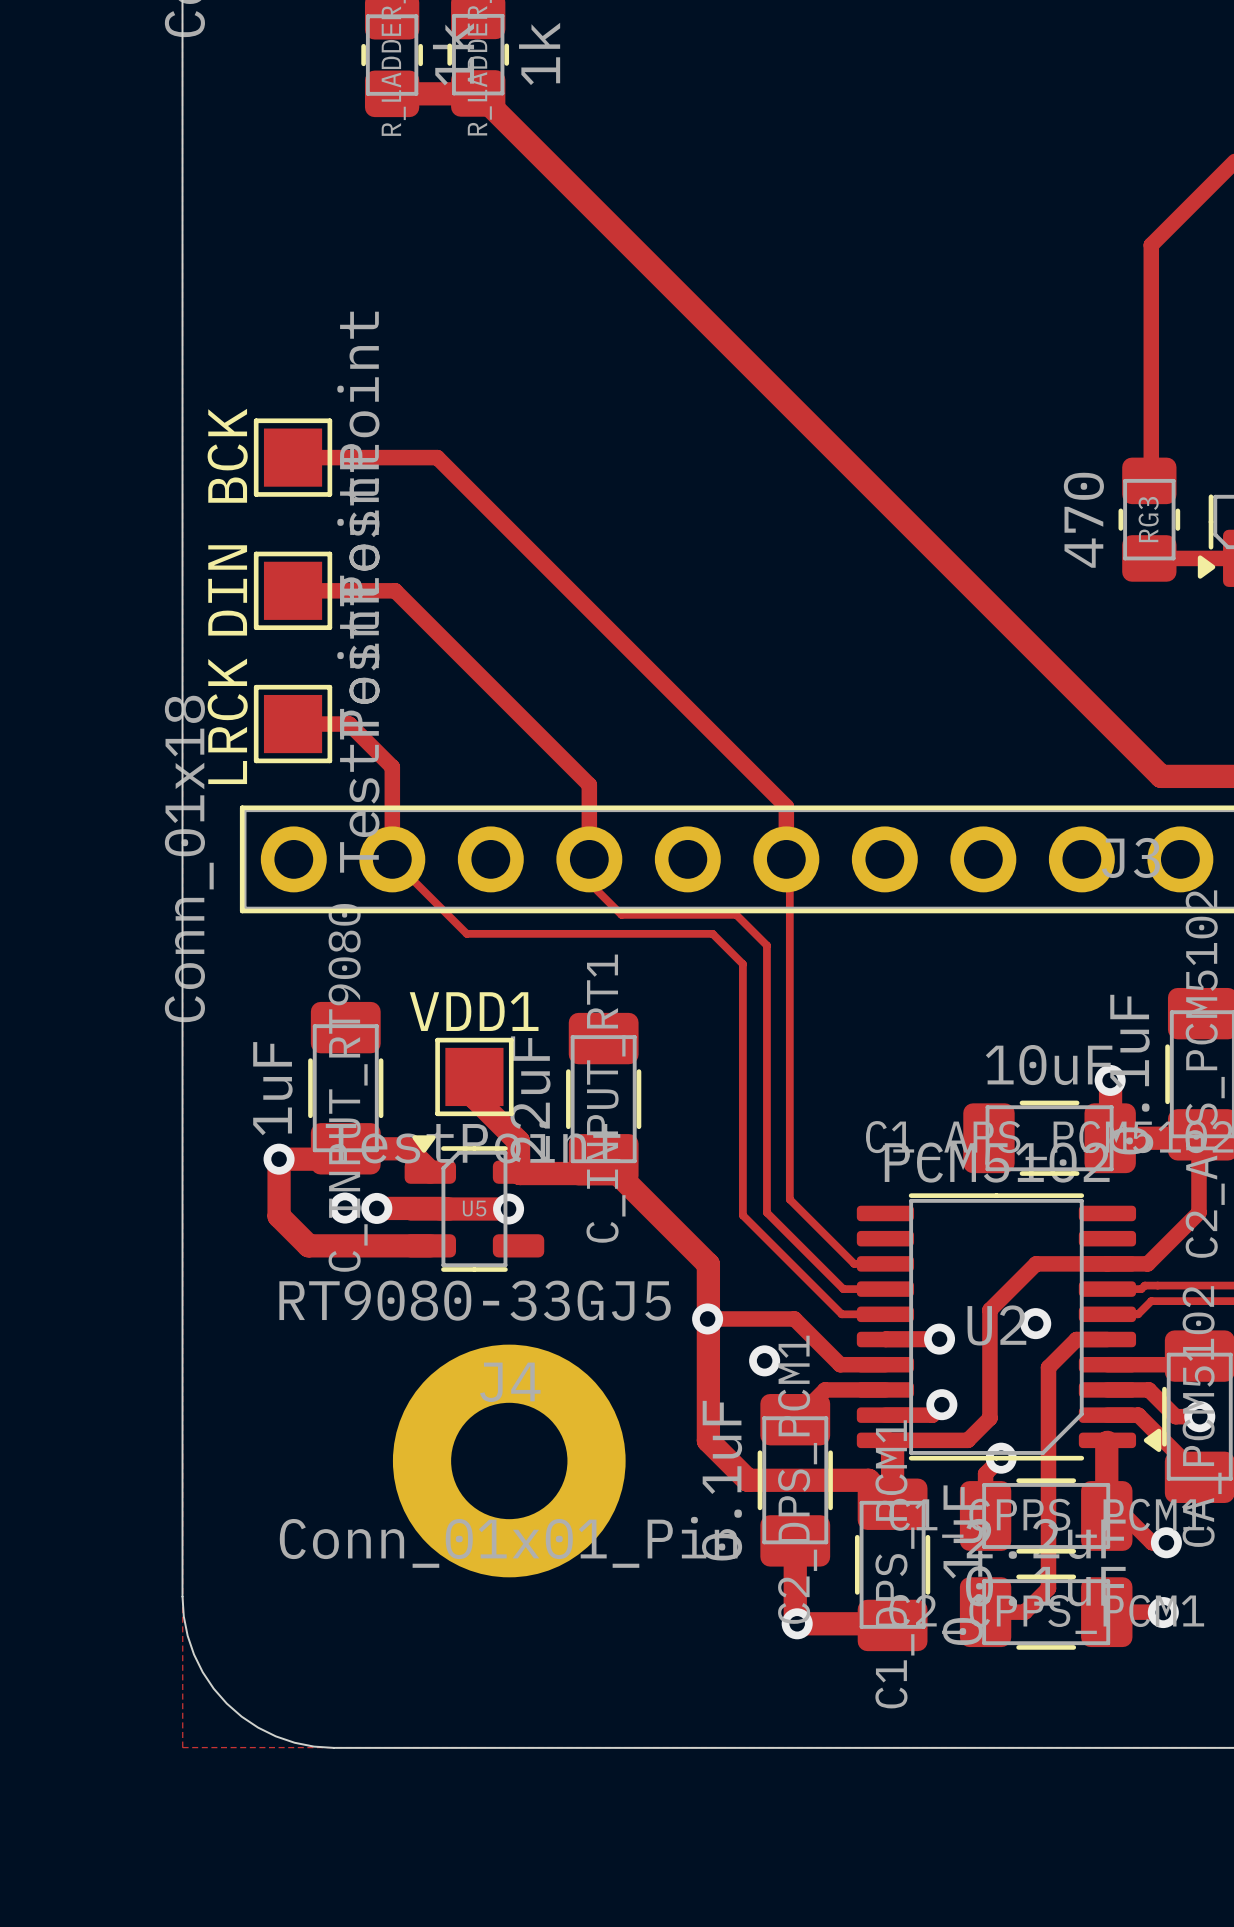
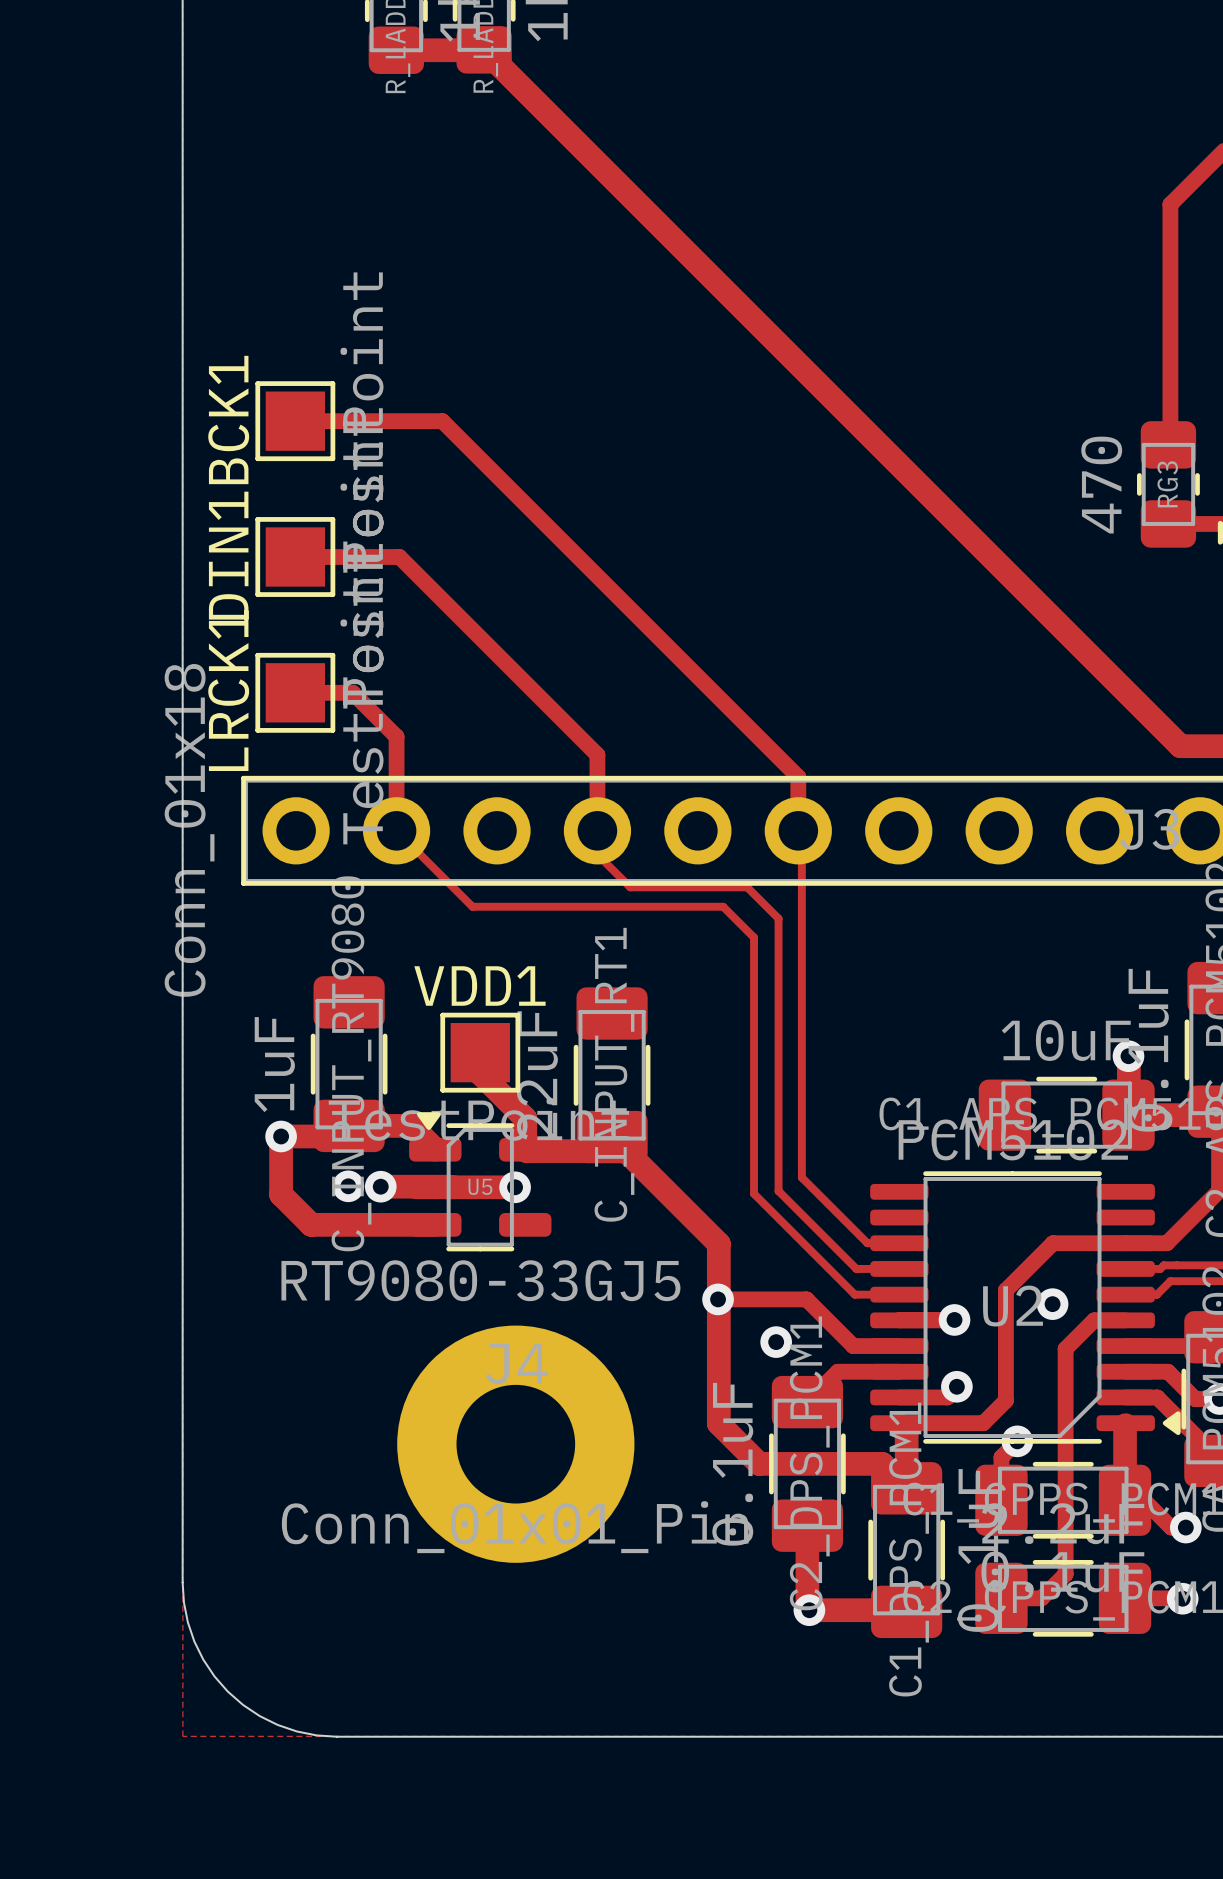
BCK name: BCK (227, 455) -> BCK1 (228, 420)
DIN name: DIN (227, 590) -> DIN1 (228, 555)
LRCK name: LRCK (227, 721) -> LRCK1 (228, 690)

